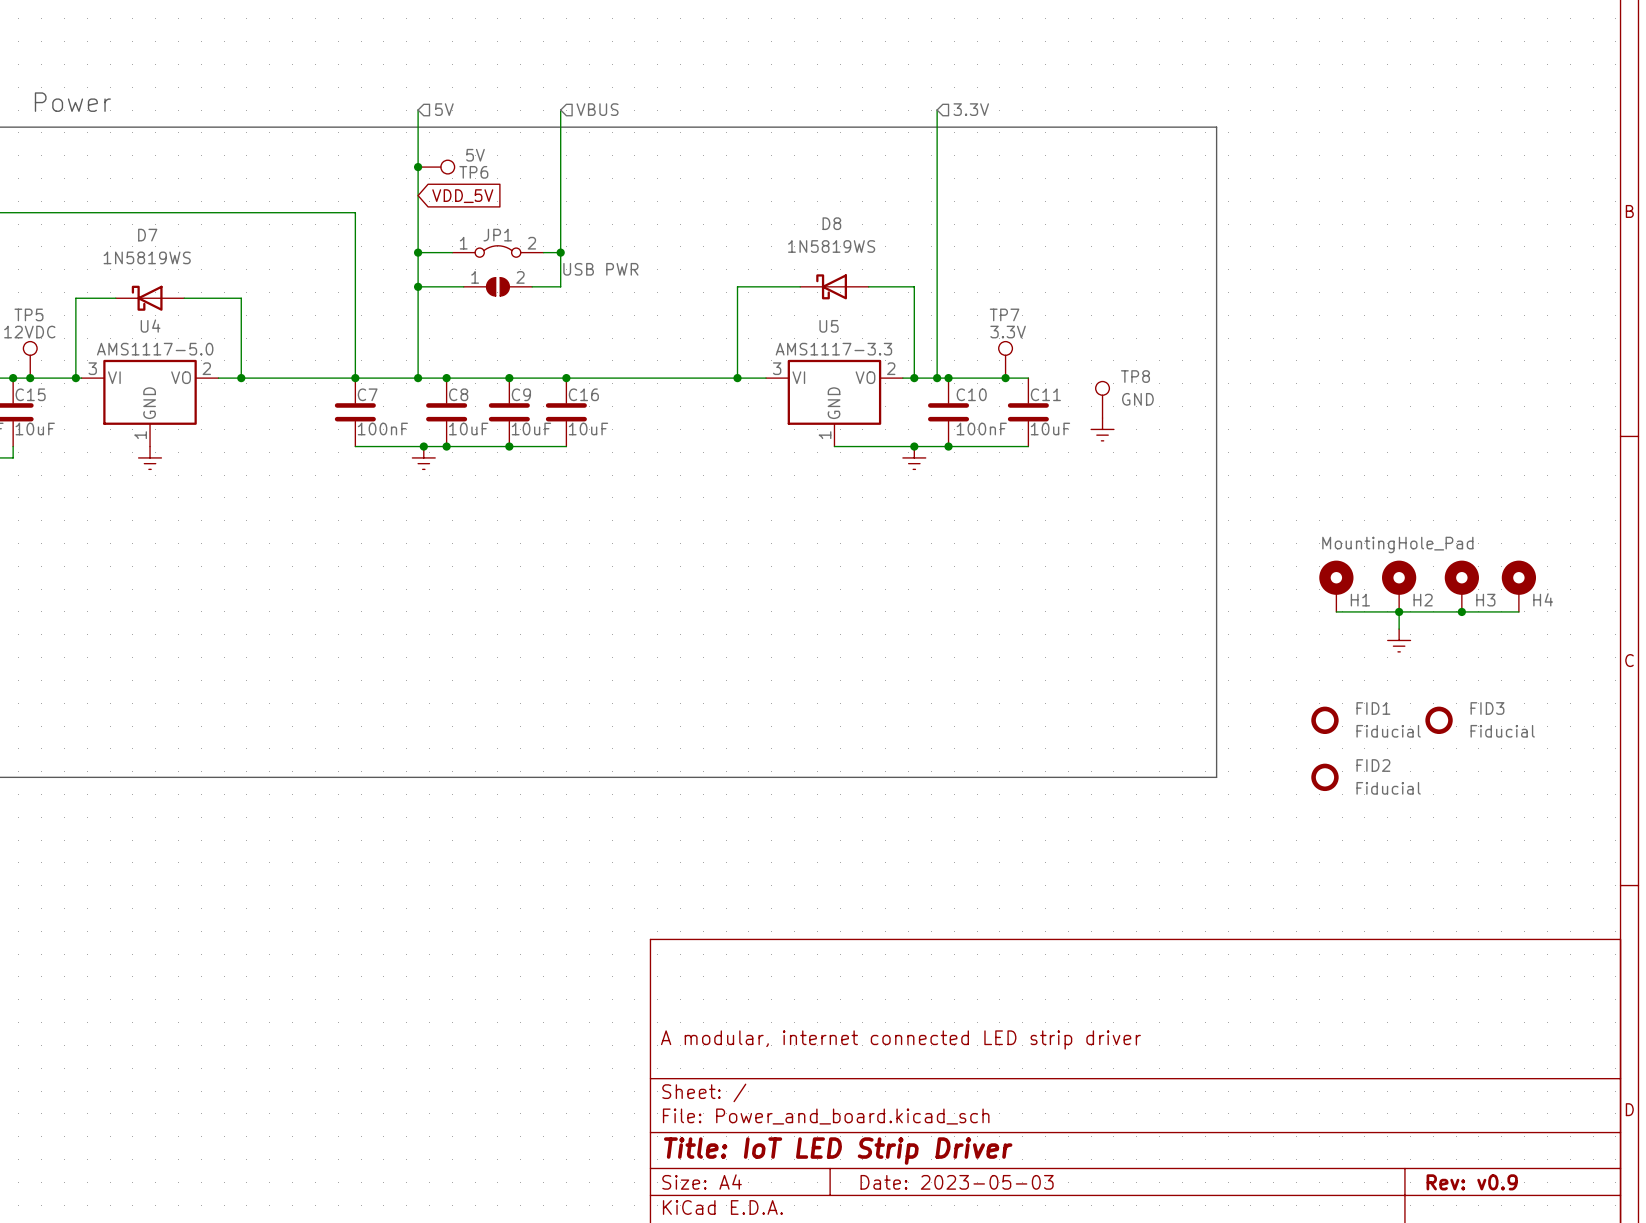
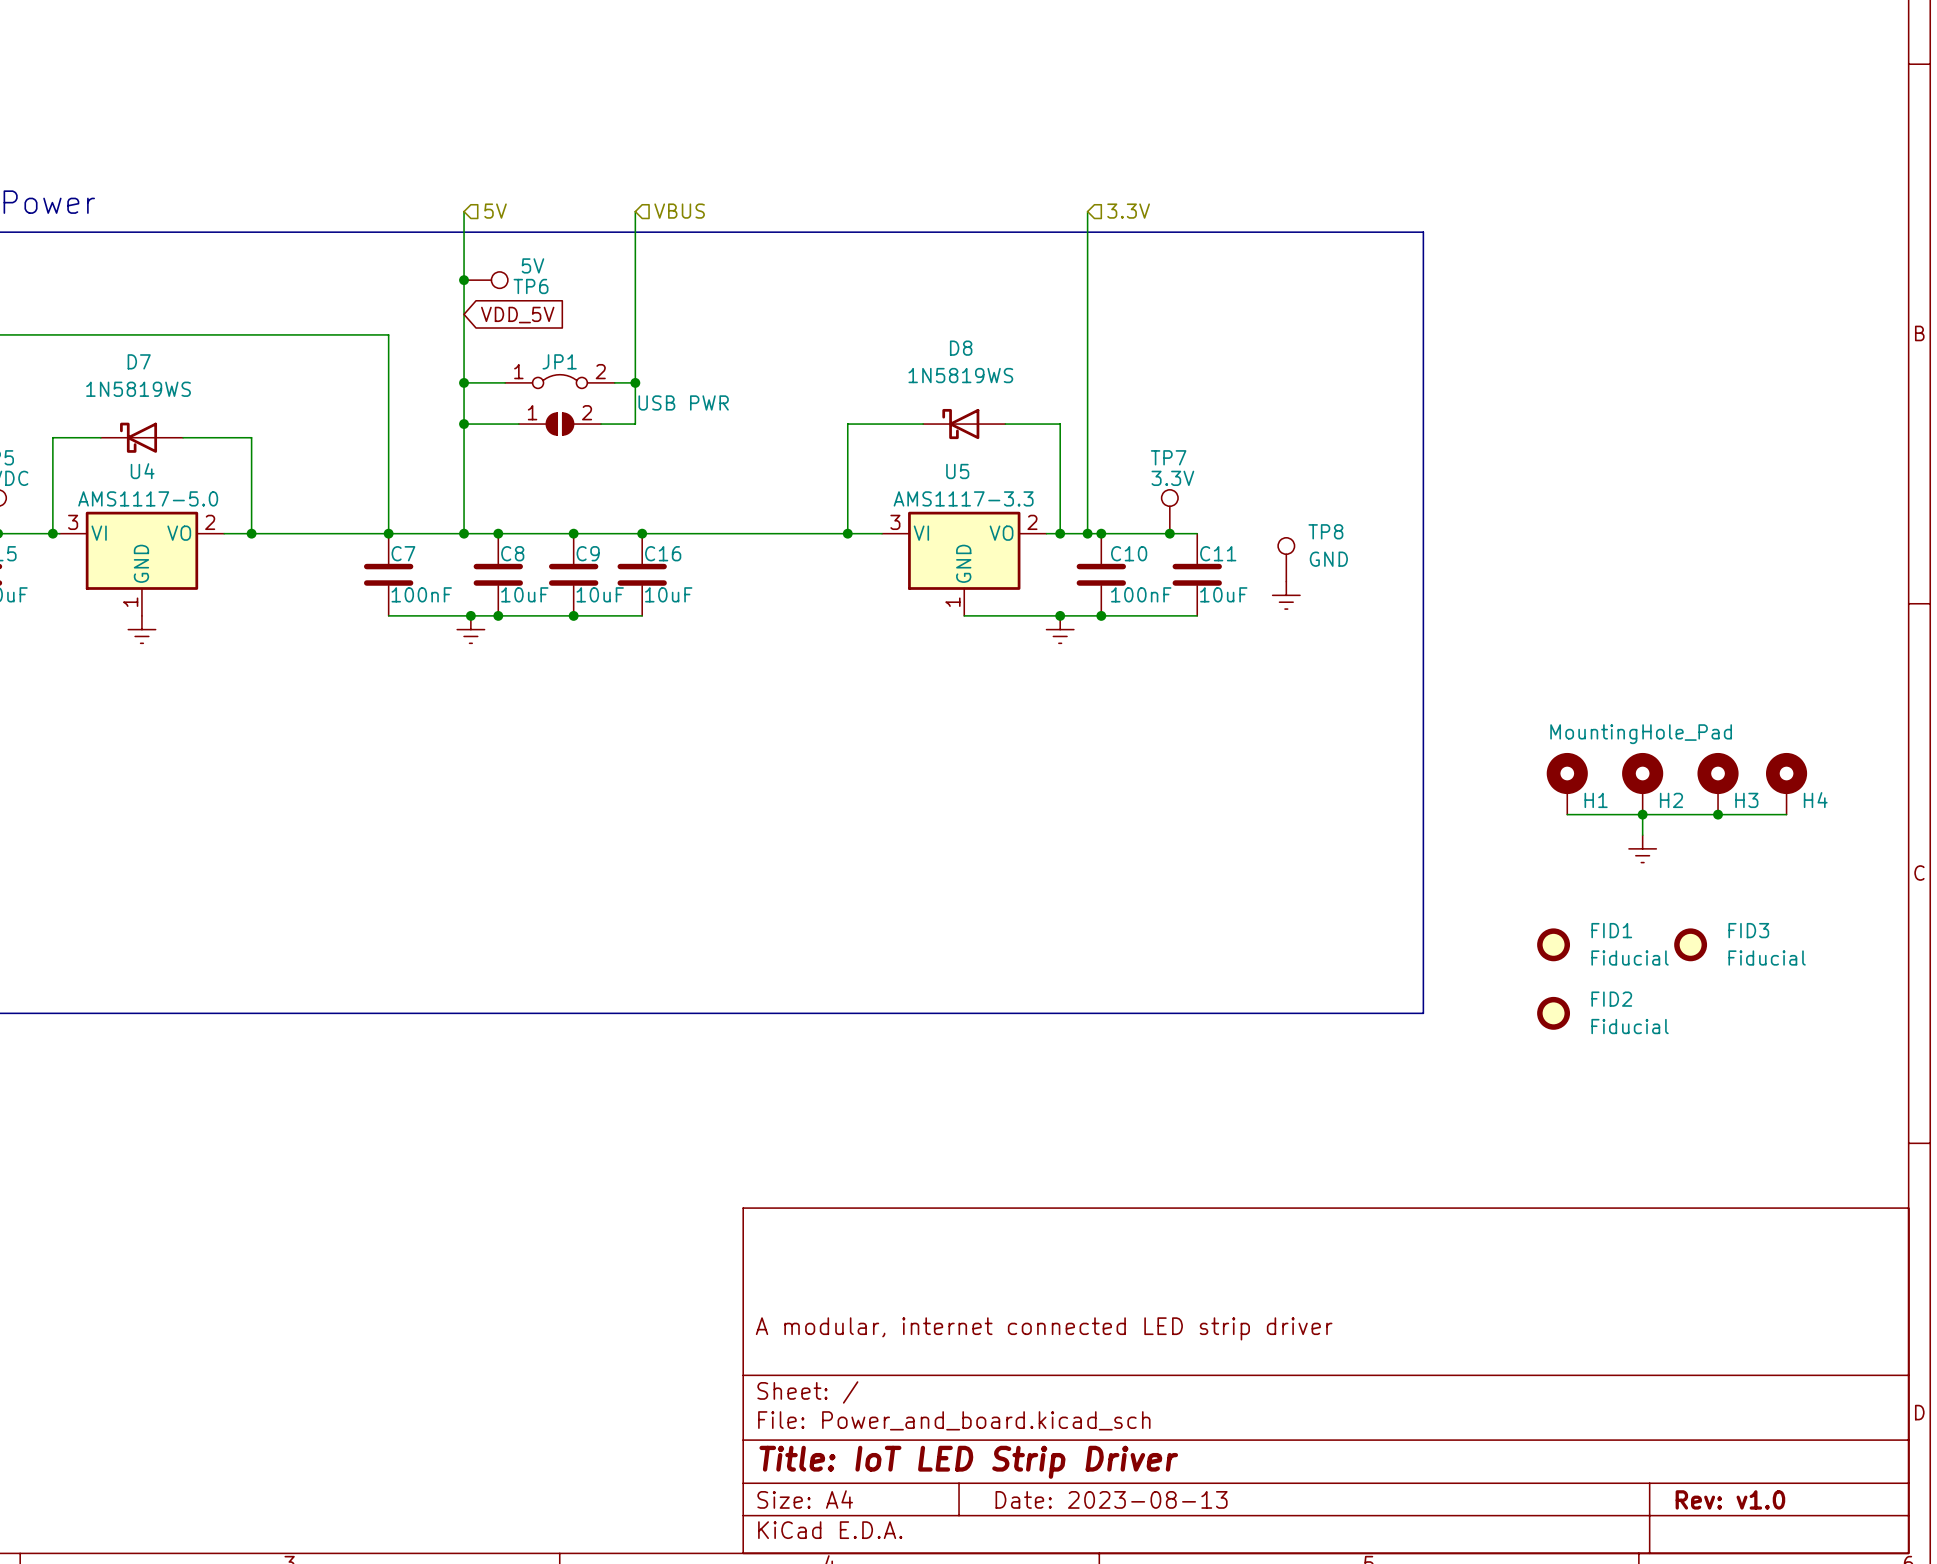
title block: Date: 2023-05-03 (957, 1182) -> Date: 2023-08-13 (1111, 1499)
title block: Rev: v0.9 (1472, 1182) -> Rev: v1.0 (1730, 1499)

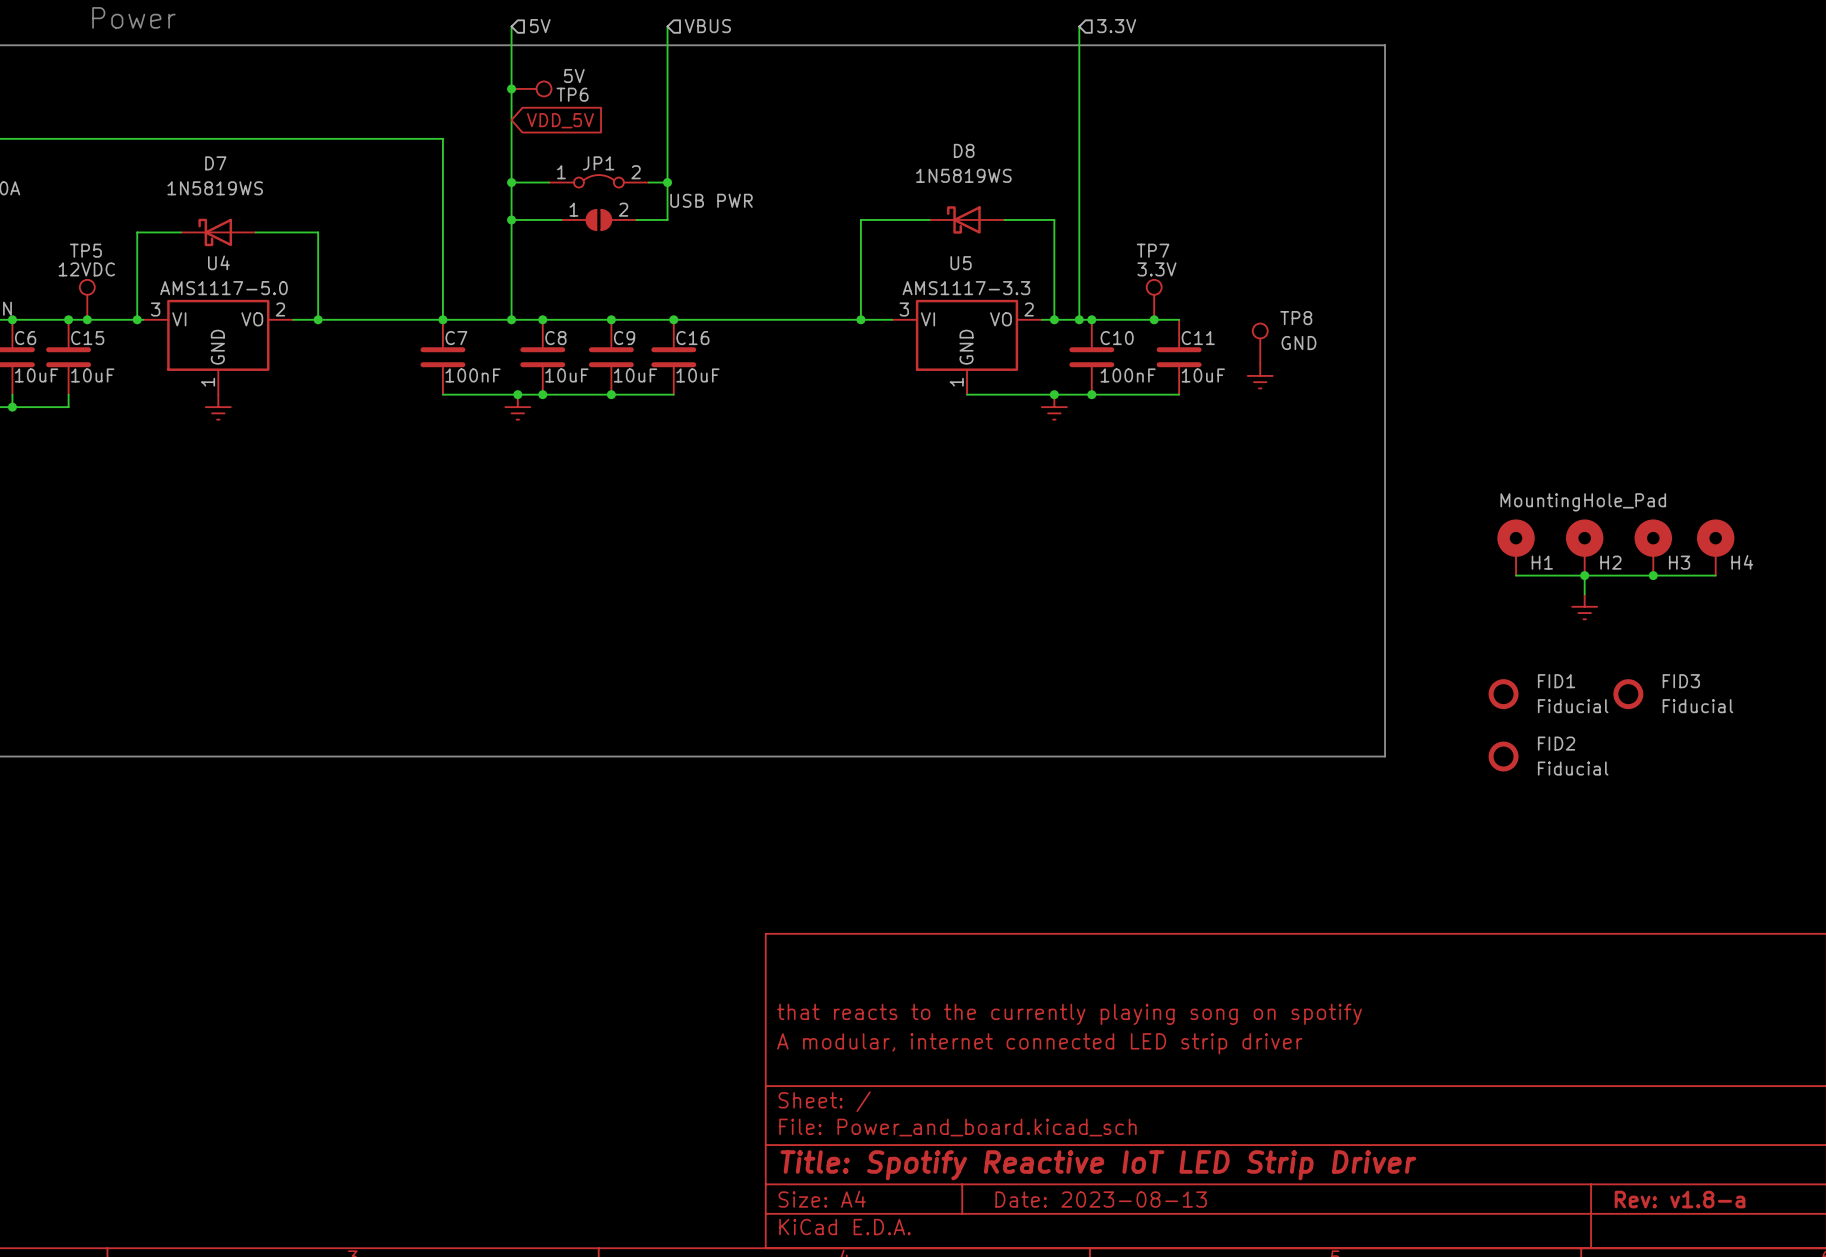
title block: none -> that reacts to the currently playing song on spotify (1069, 1014)
title block: Title: IoT LED Strip Driver (968, 1462) -> Title: Spotify Reactive IoT LED Strip Driver (1098, 1165)
title block: Rev: v1.0 (1730, 1499) -> Rev: v1.8-a (1680, 1199)

